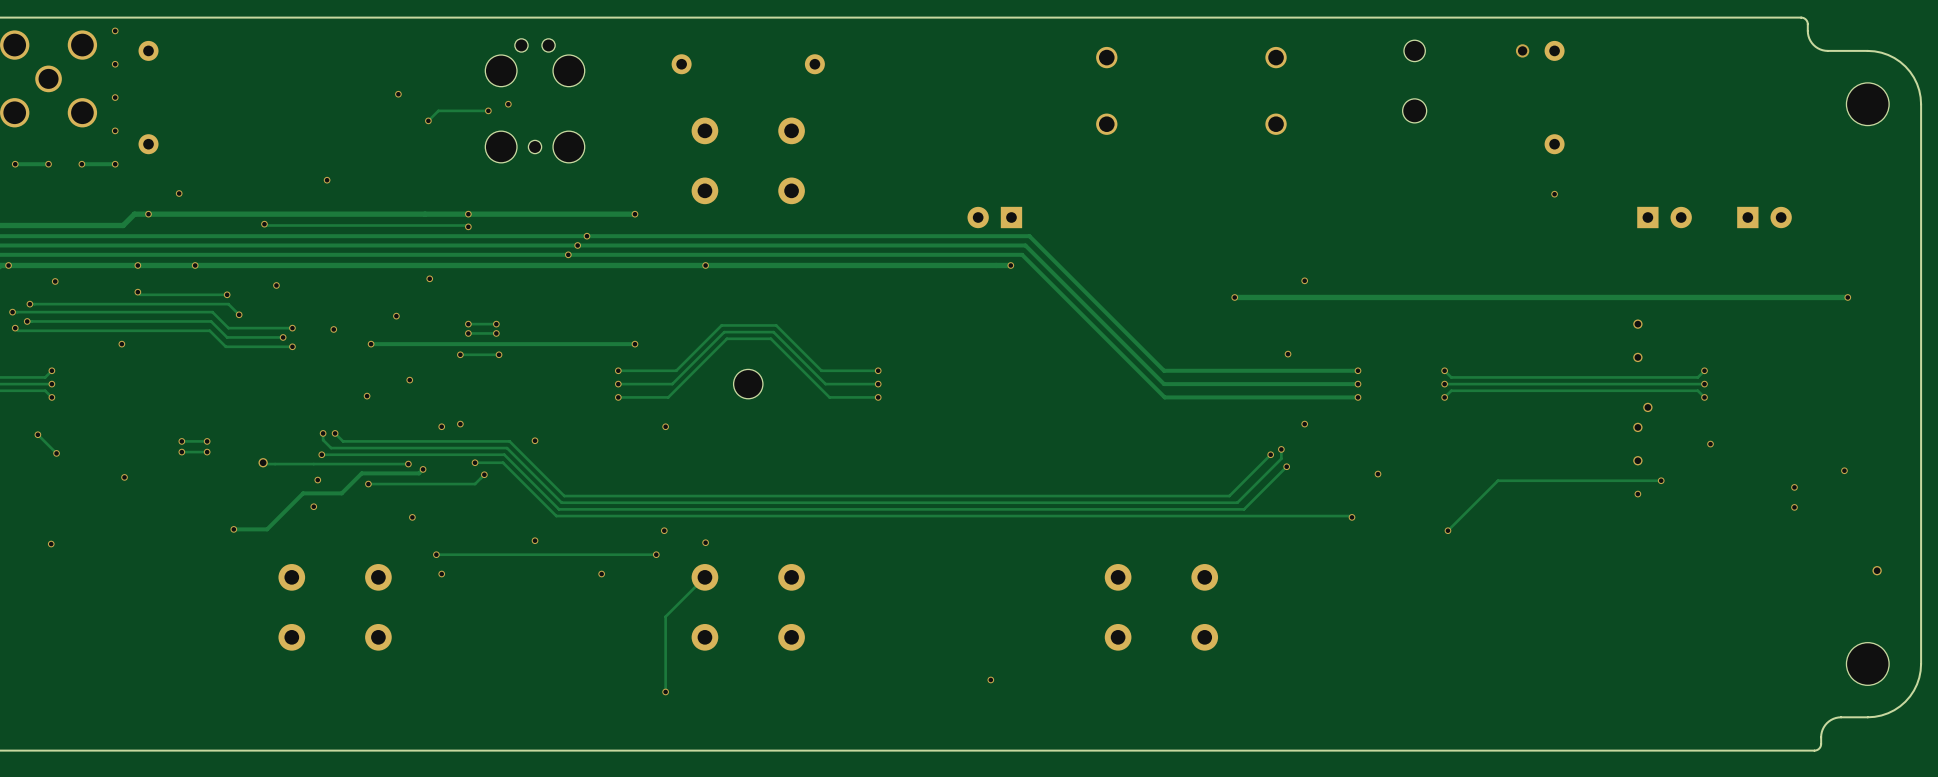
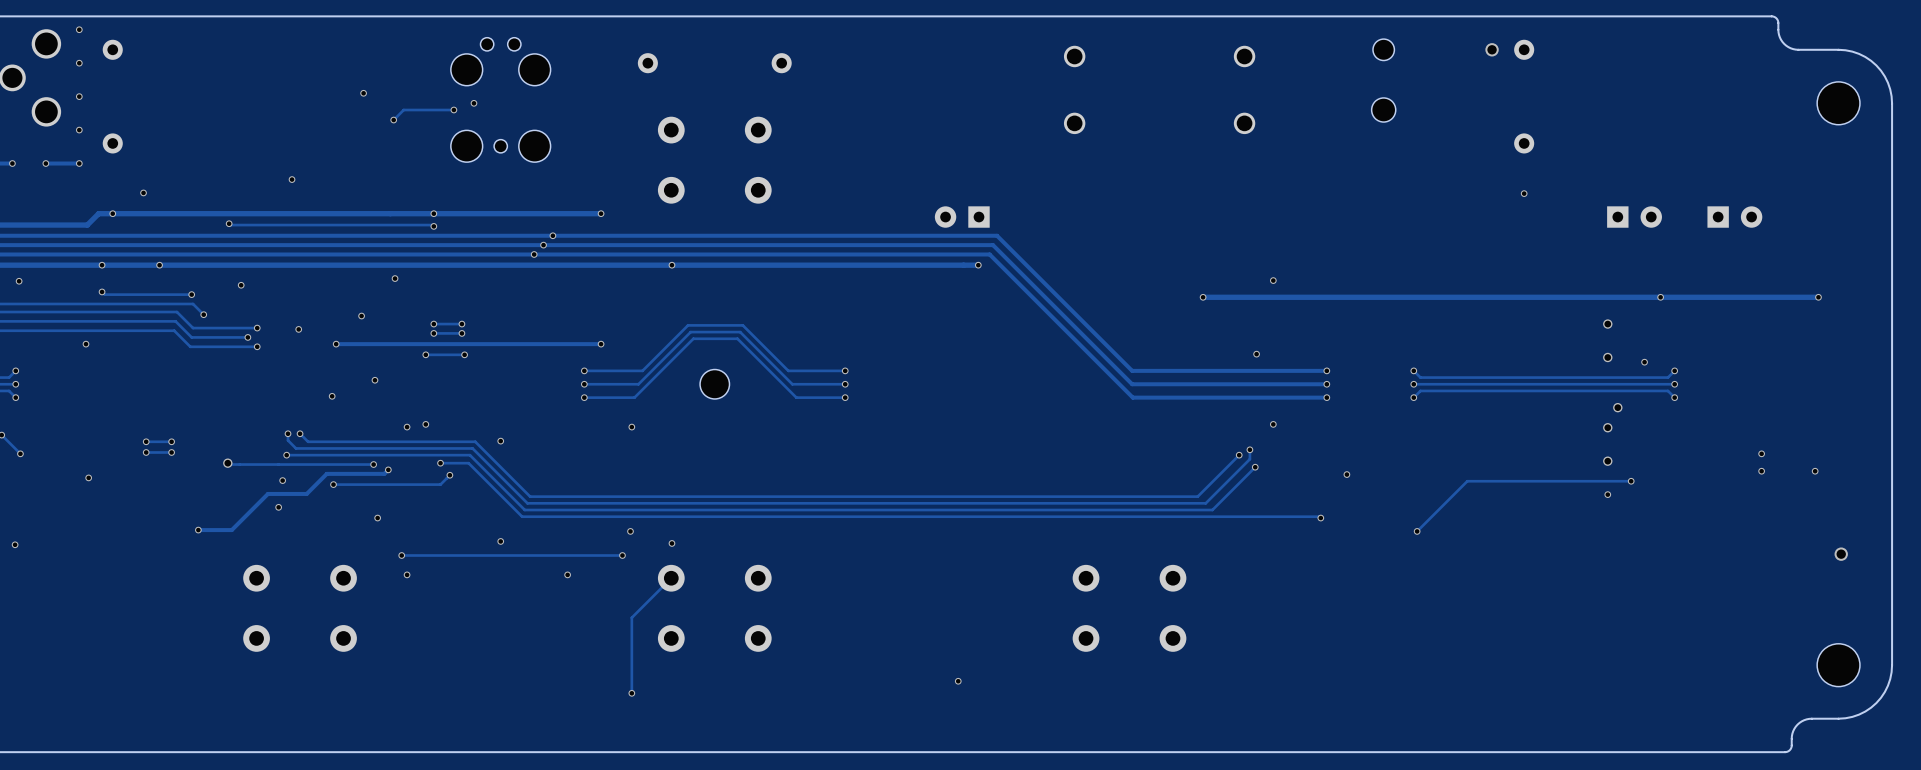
via: none -> (1660, 297)
via: none -> (1644, 362)
via: (1710, 444) -> none
via: none -> (1761, 453)
via: none -> (1761, 471)
via: (1794, 487) -> none
via: (1794, 507) -> none
via: none -> (1841, 554)
via: (1877, 570) -> none

